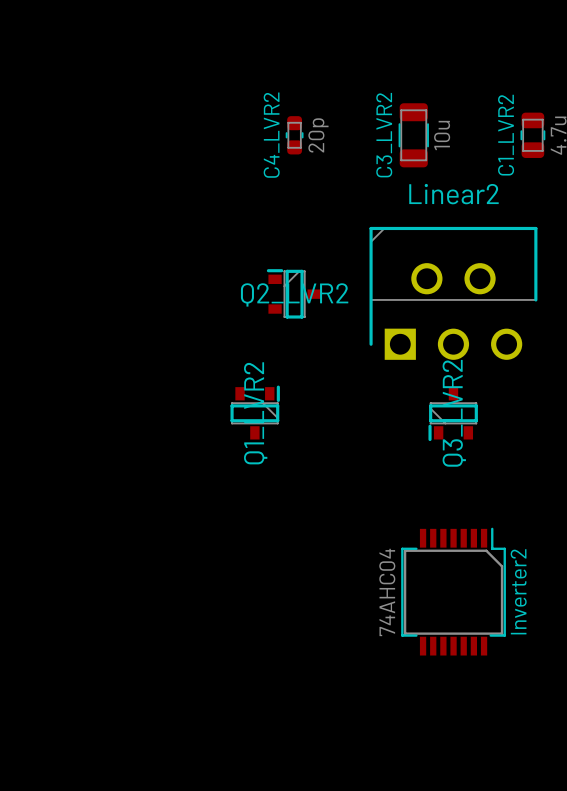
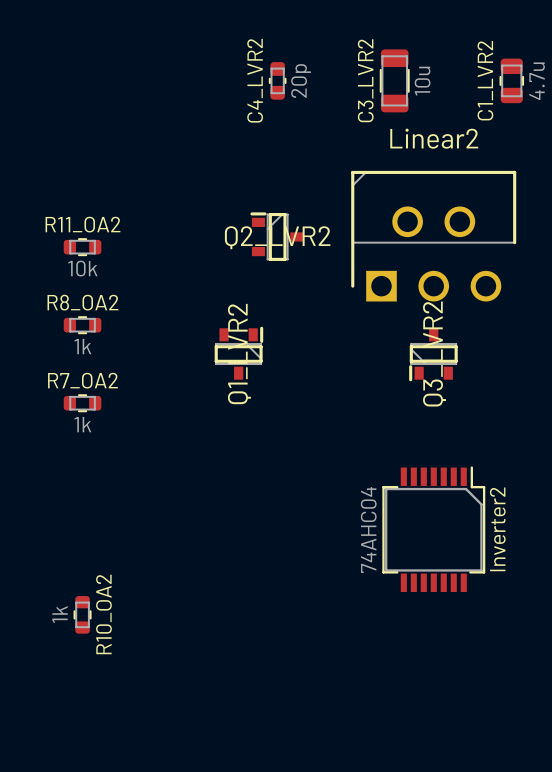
R11_OA2: none -> 10k (82, 247)
R8_OA2: none -> 1k (82, 325)
R7_OA2: none -> 1k (82, 403)
R10_OA2: none -> 1k (82, 614)

